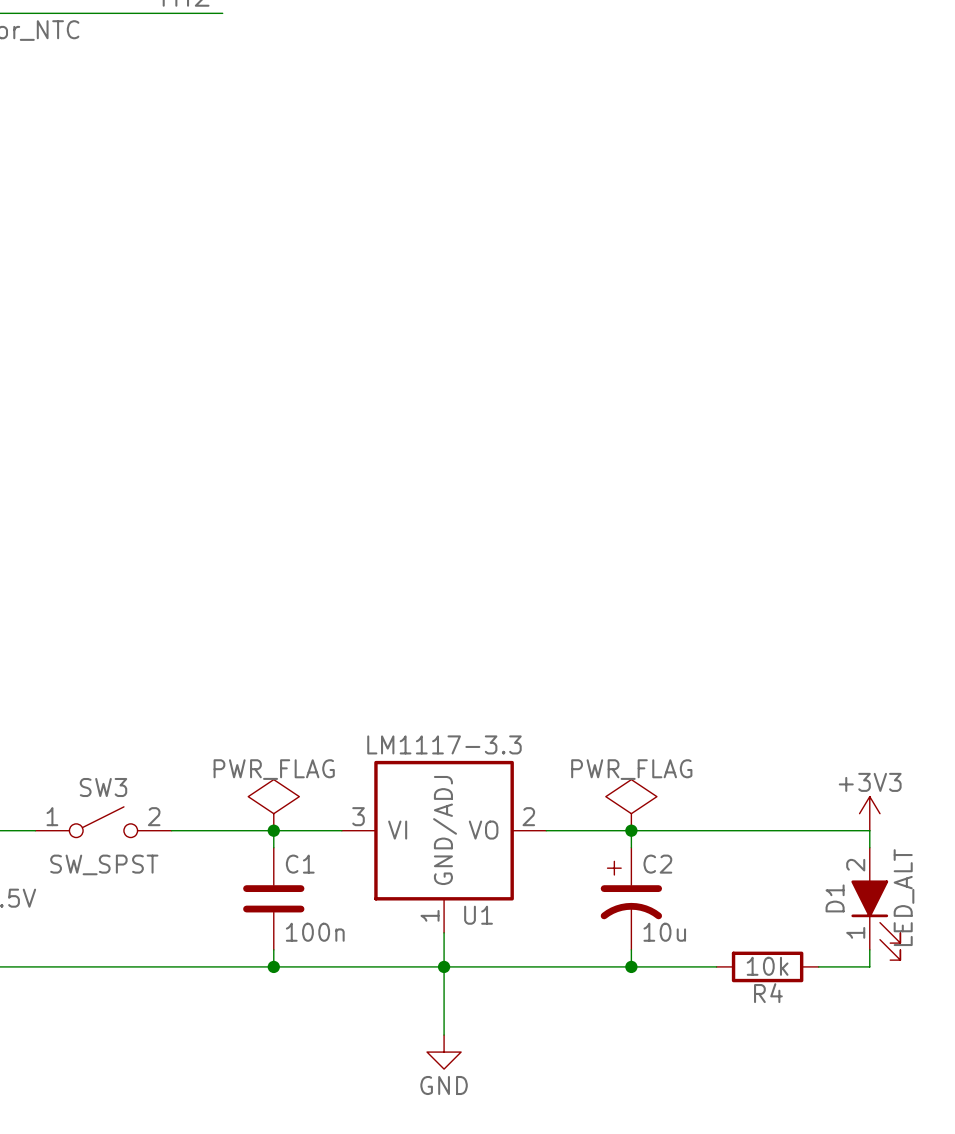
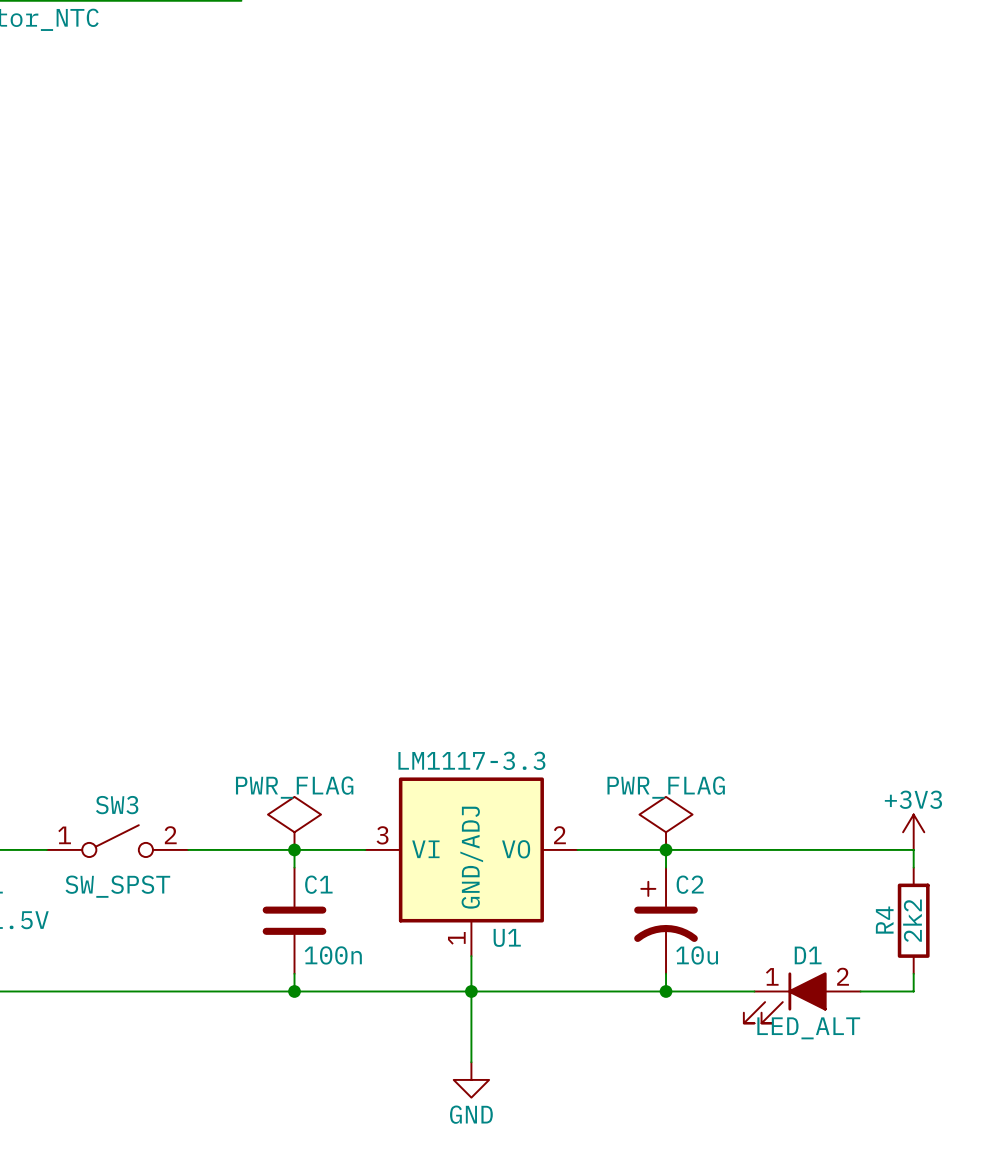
D1 position: (875, 903) -> (802, 997)
D1 rotation: 0° (875, 920) -> 90° clockwise (785, 997)
R4 rotation: 0° (767, 966) -> 90° clockwise (913, 920)
R4 position: (767, 966) -> (913, 920)
R4 value: 10k (767, 966) -> 2k2 (912, 920)

